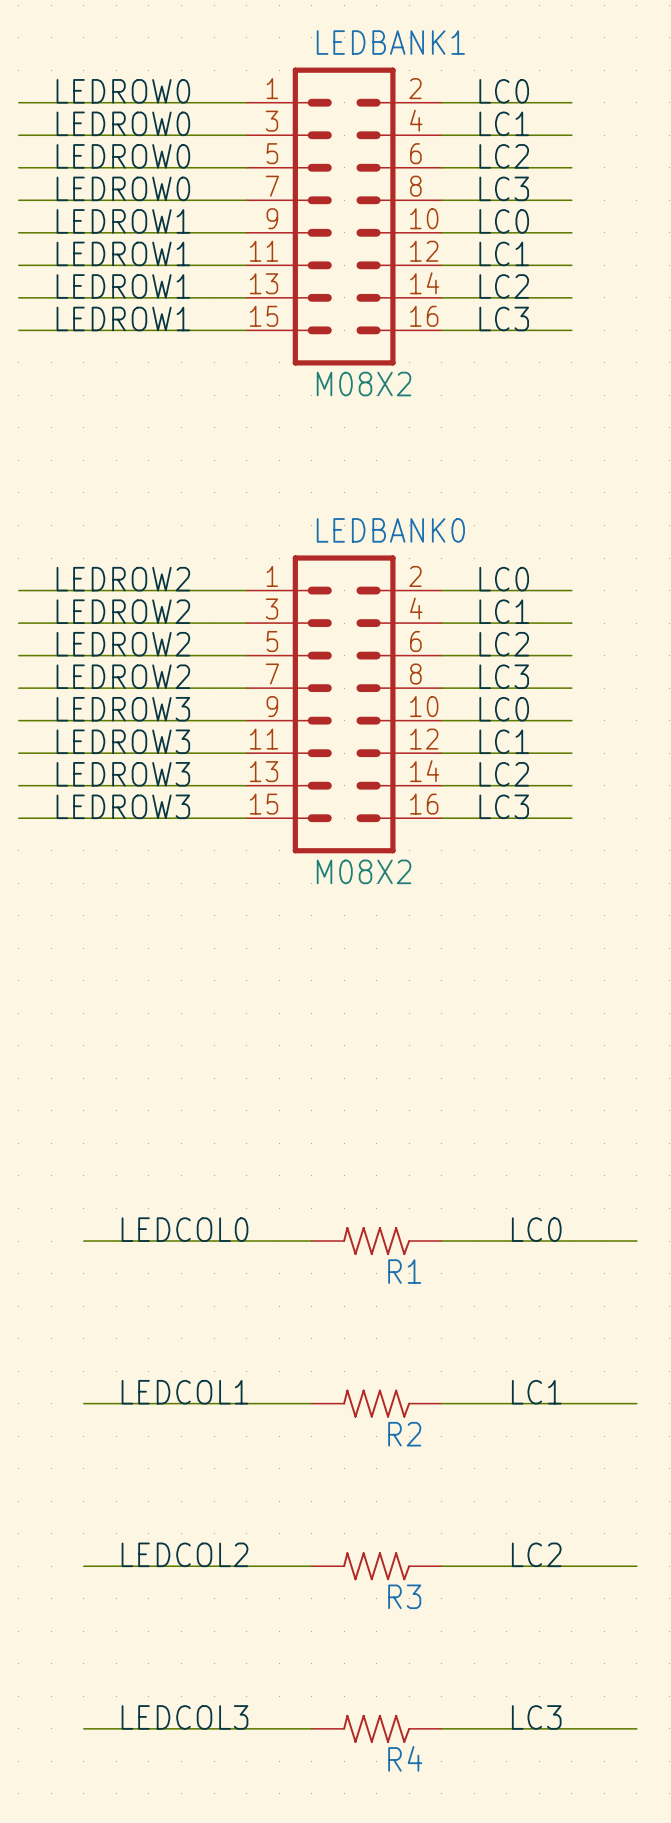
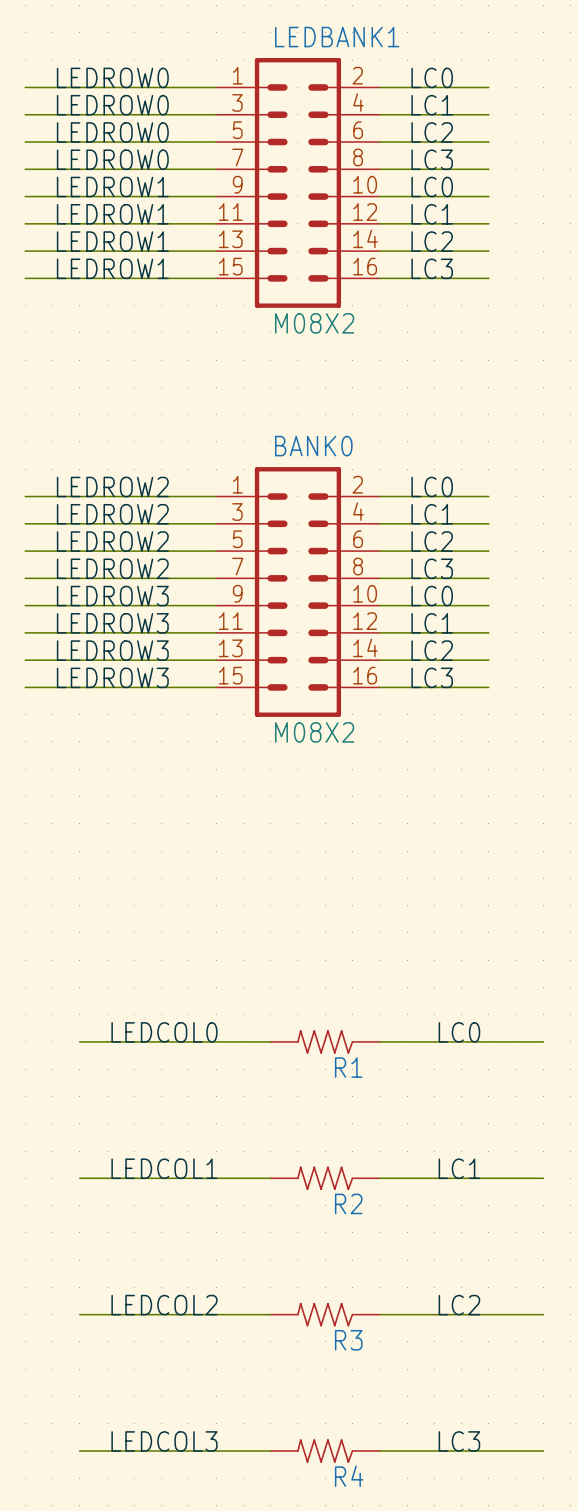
LEDBANK0 name: LEDBANK0 (390, 530) -> BANK0 (313, 446)

